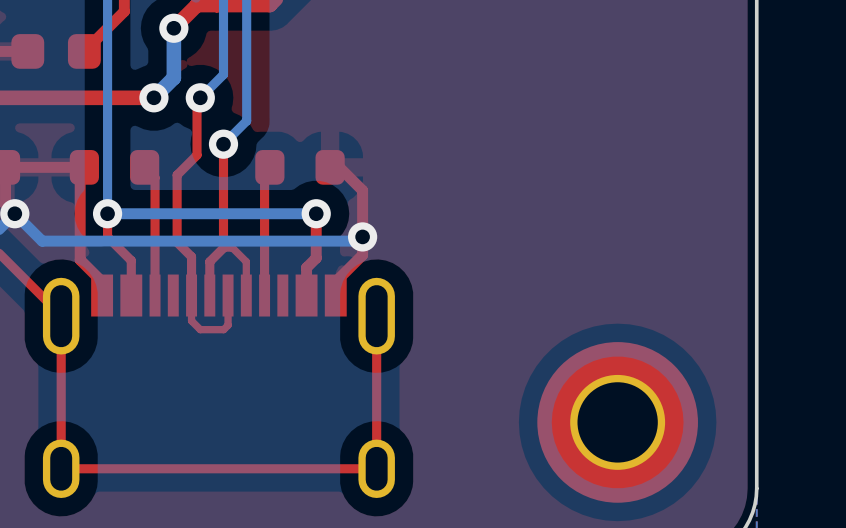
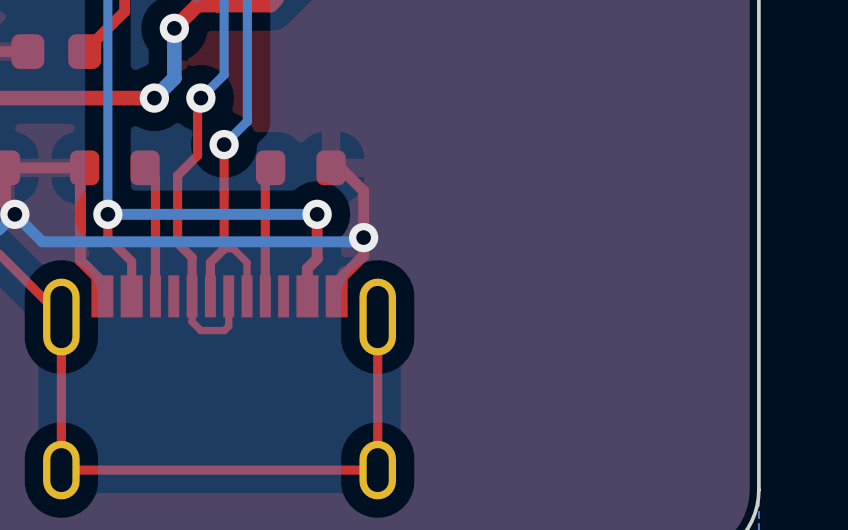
part: (617, 422) -> none

